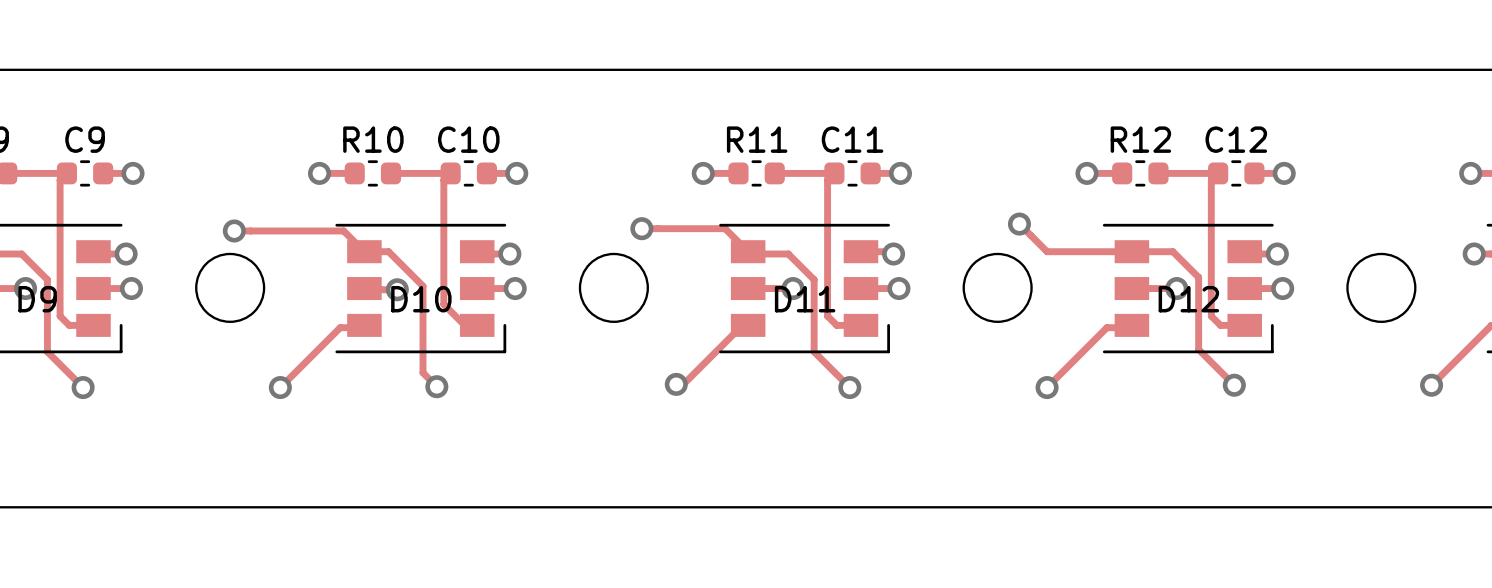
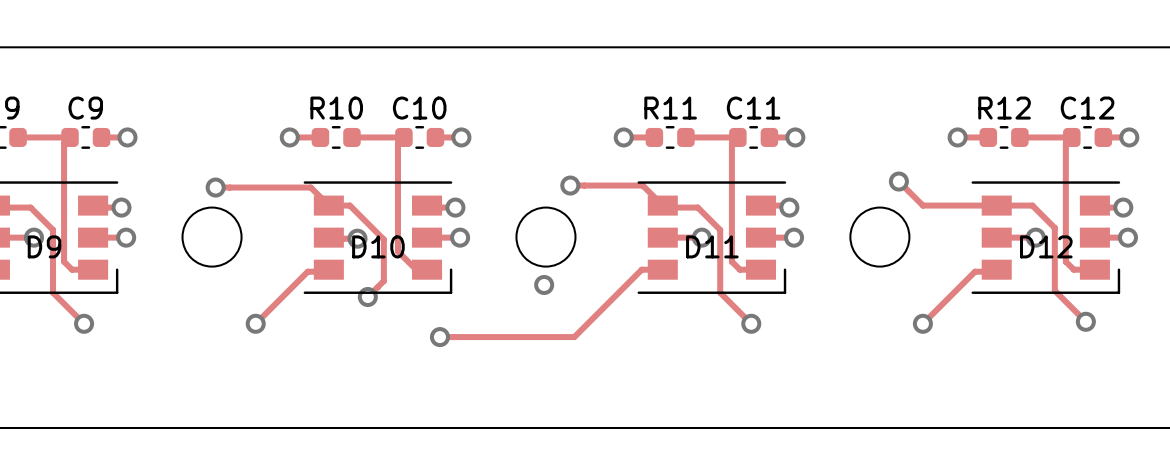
track: (423, 286) (423, 372) (436, 386) -> (379, 235) (383, 239) (383, 280) (367, 297)
track: (742, 325) (683, 384) (676, 384) -> (657, 269) (641, 269) (574, 337) (439, 337)
via: none -> (367, 297)
via position: (676, 384) -> (544, 284)
via: (436, 386) -> none
via: none -> (439, 337)

